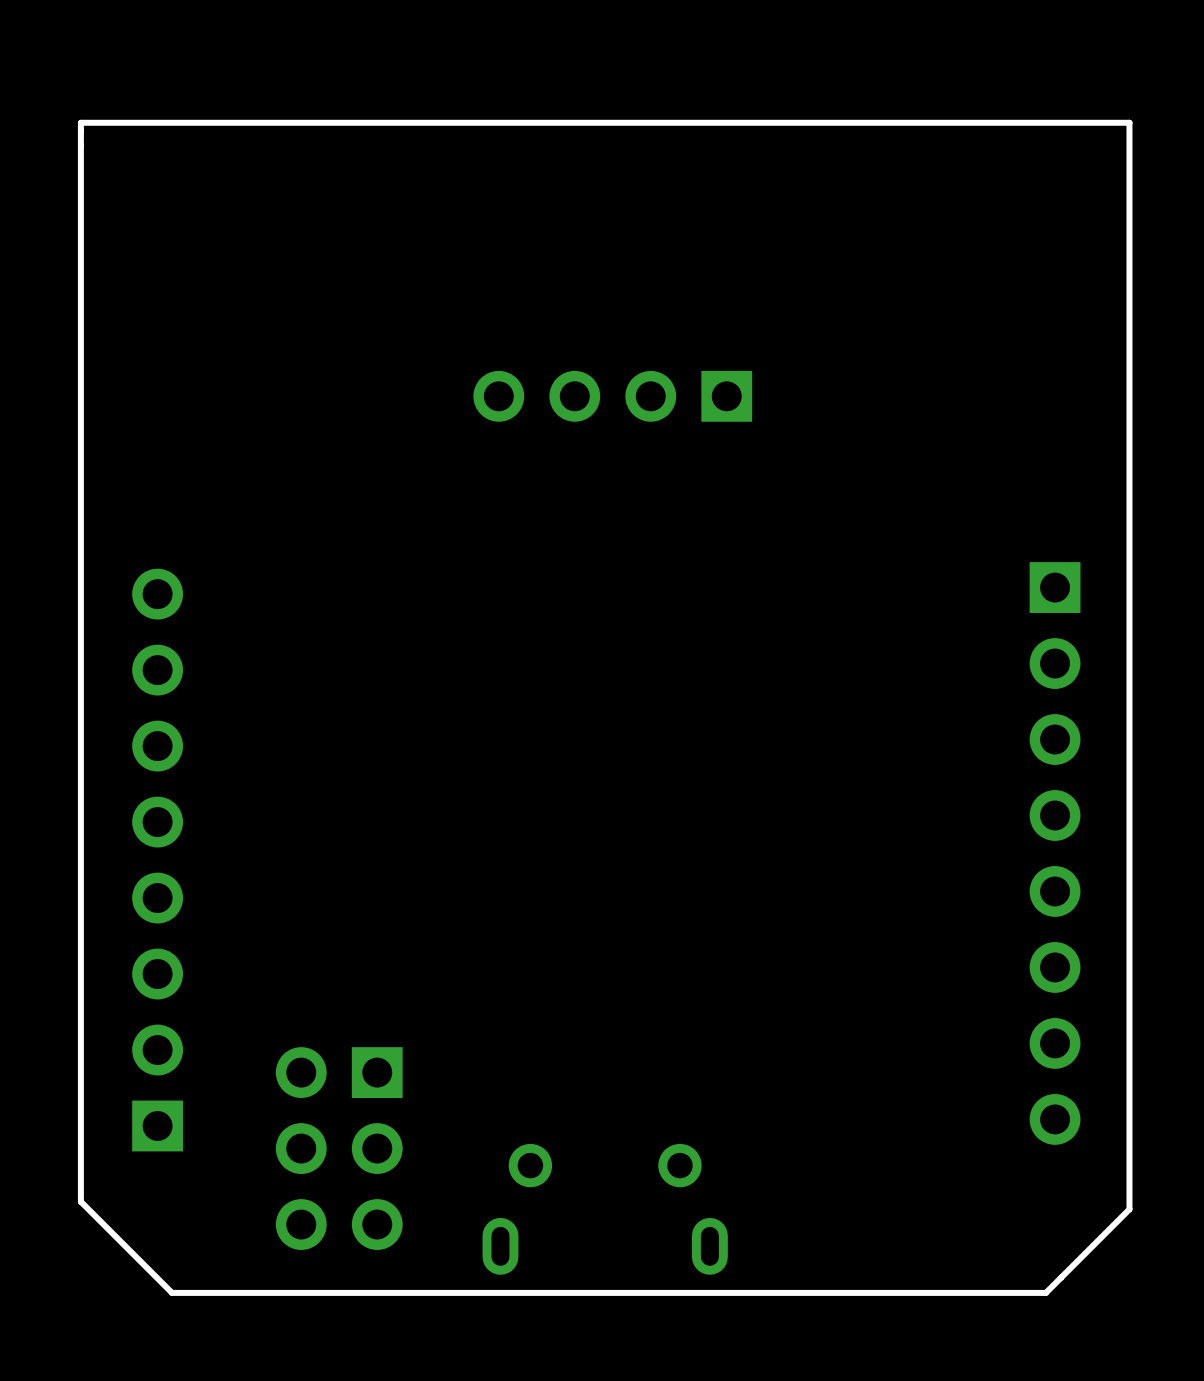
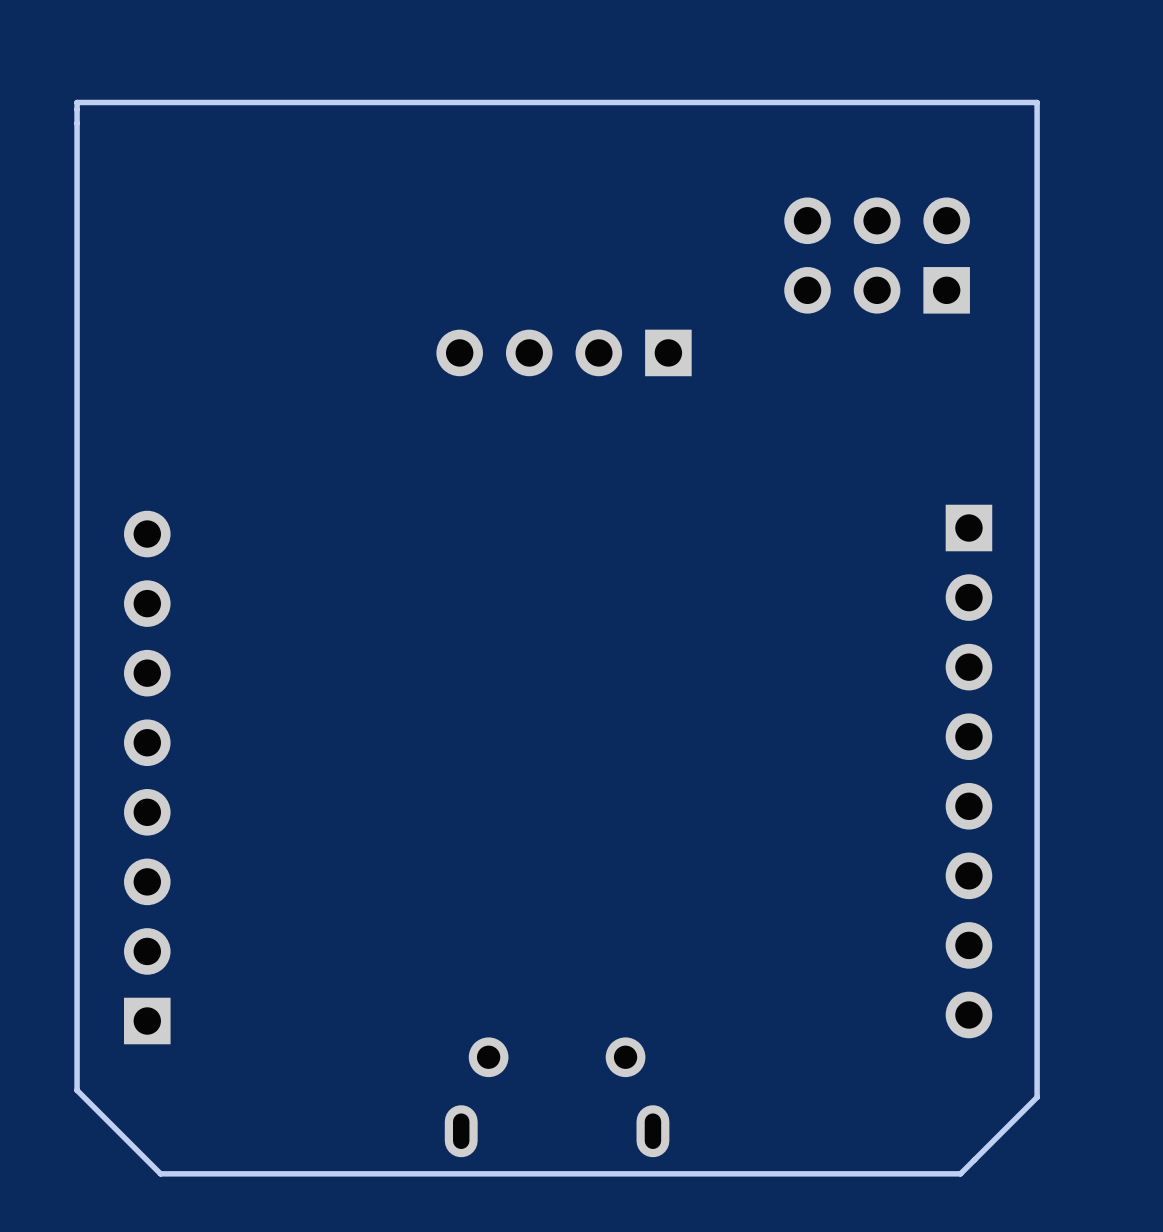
part: none -> (877, 255)
part: (339, 1148) -> none

